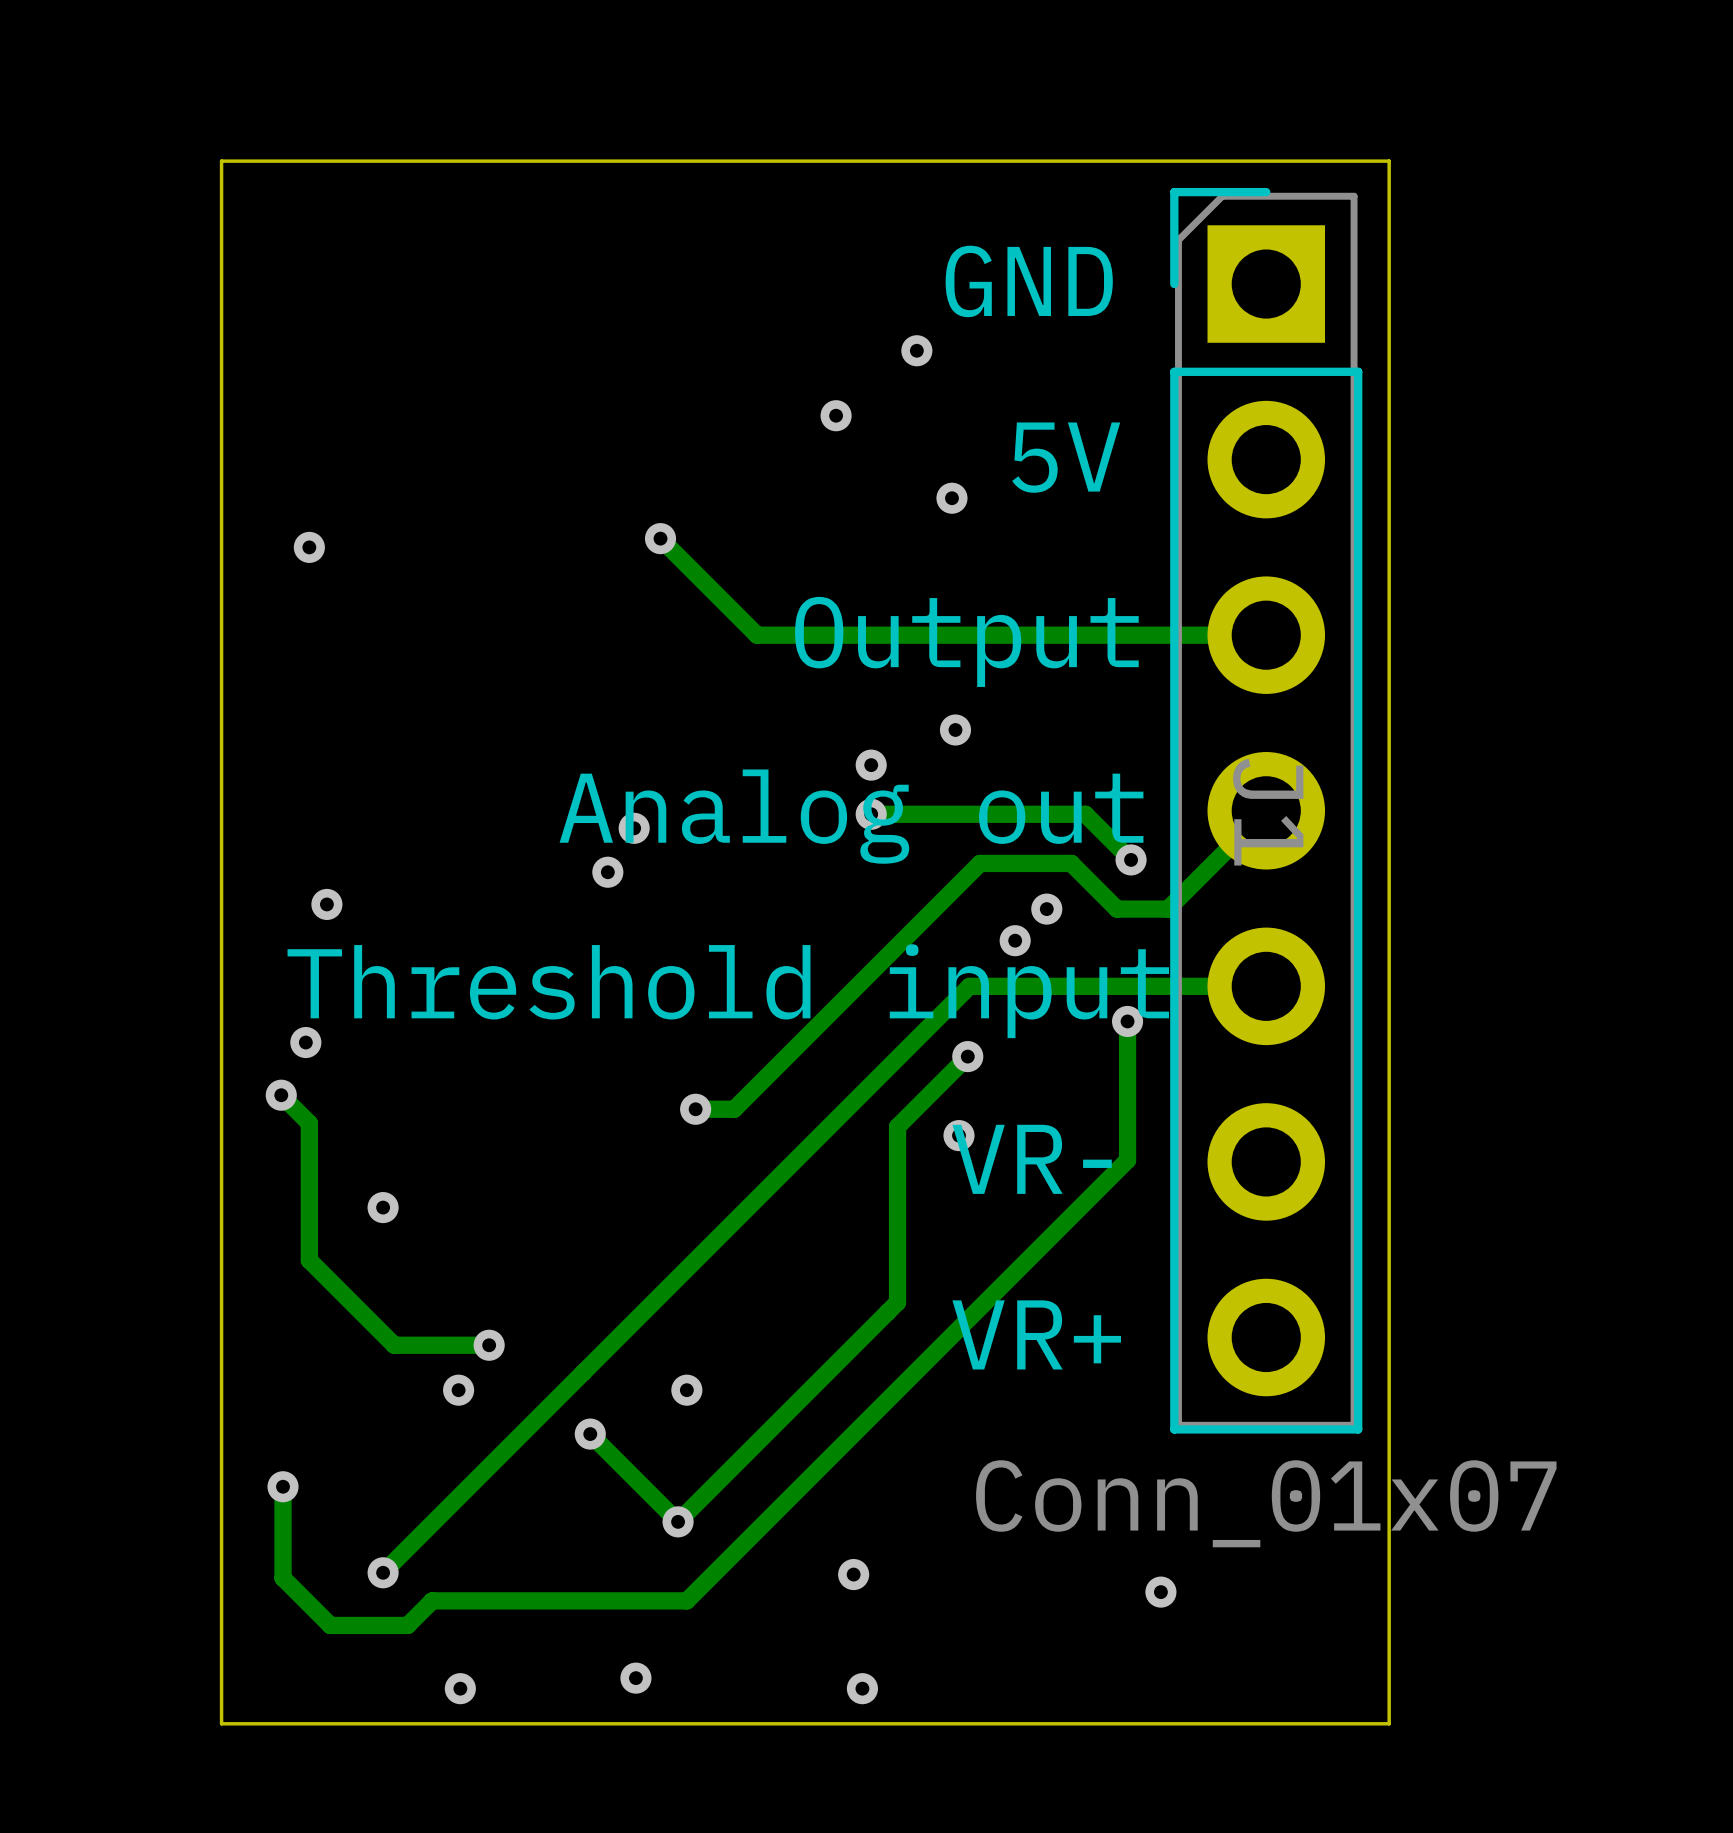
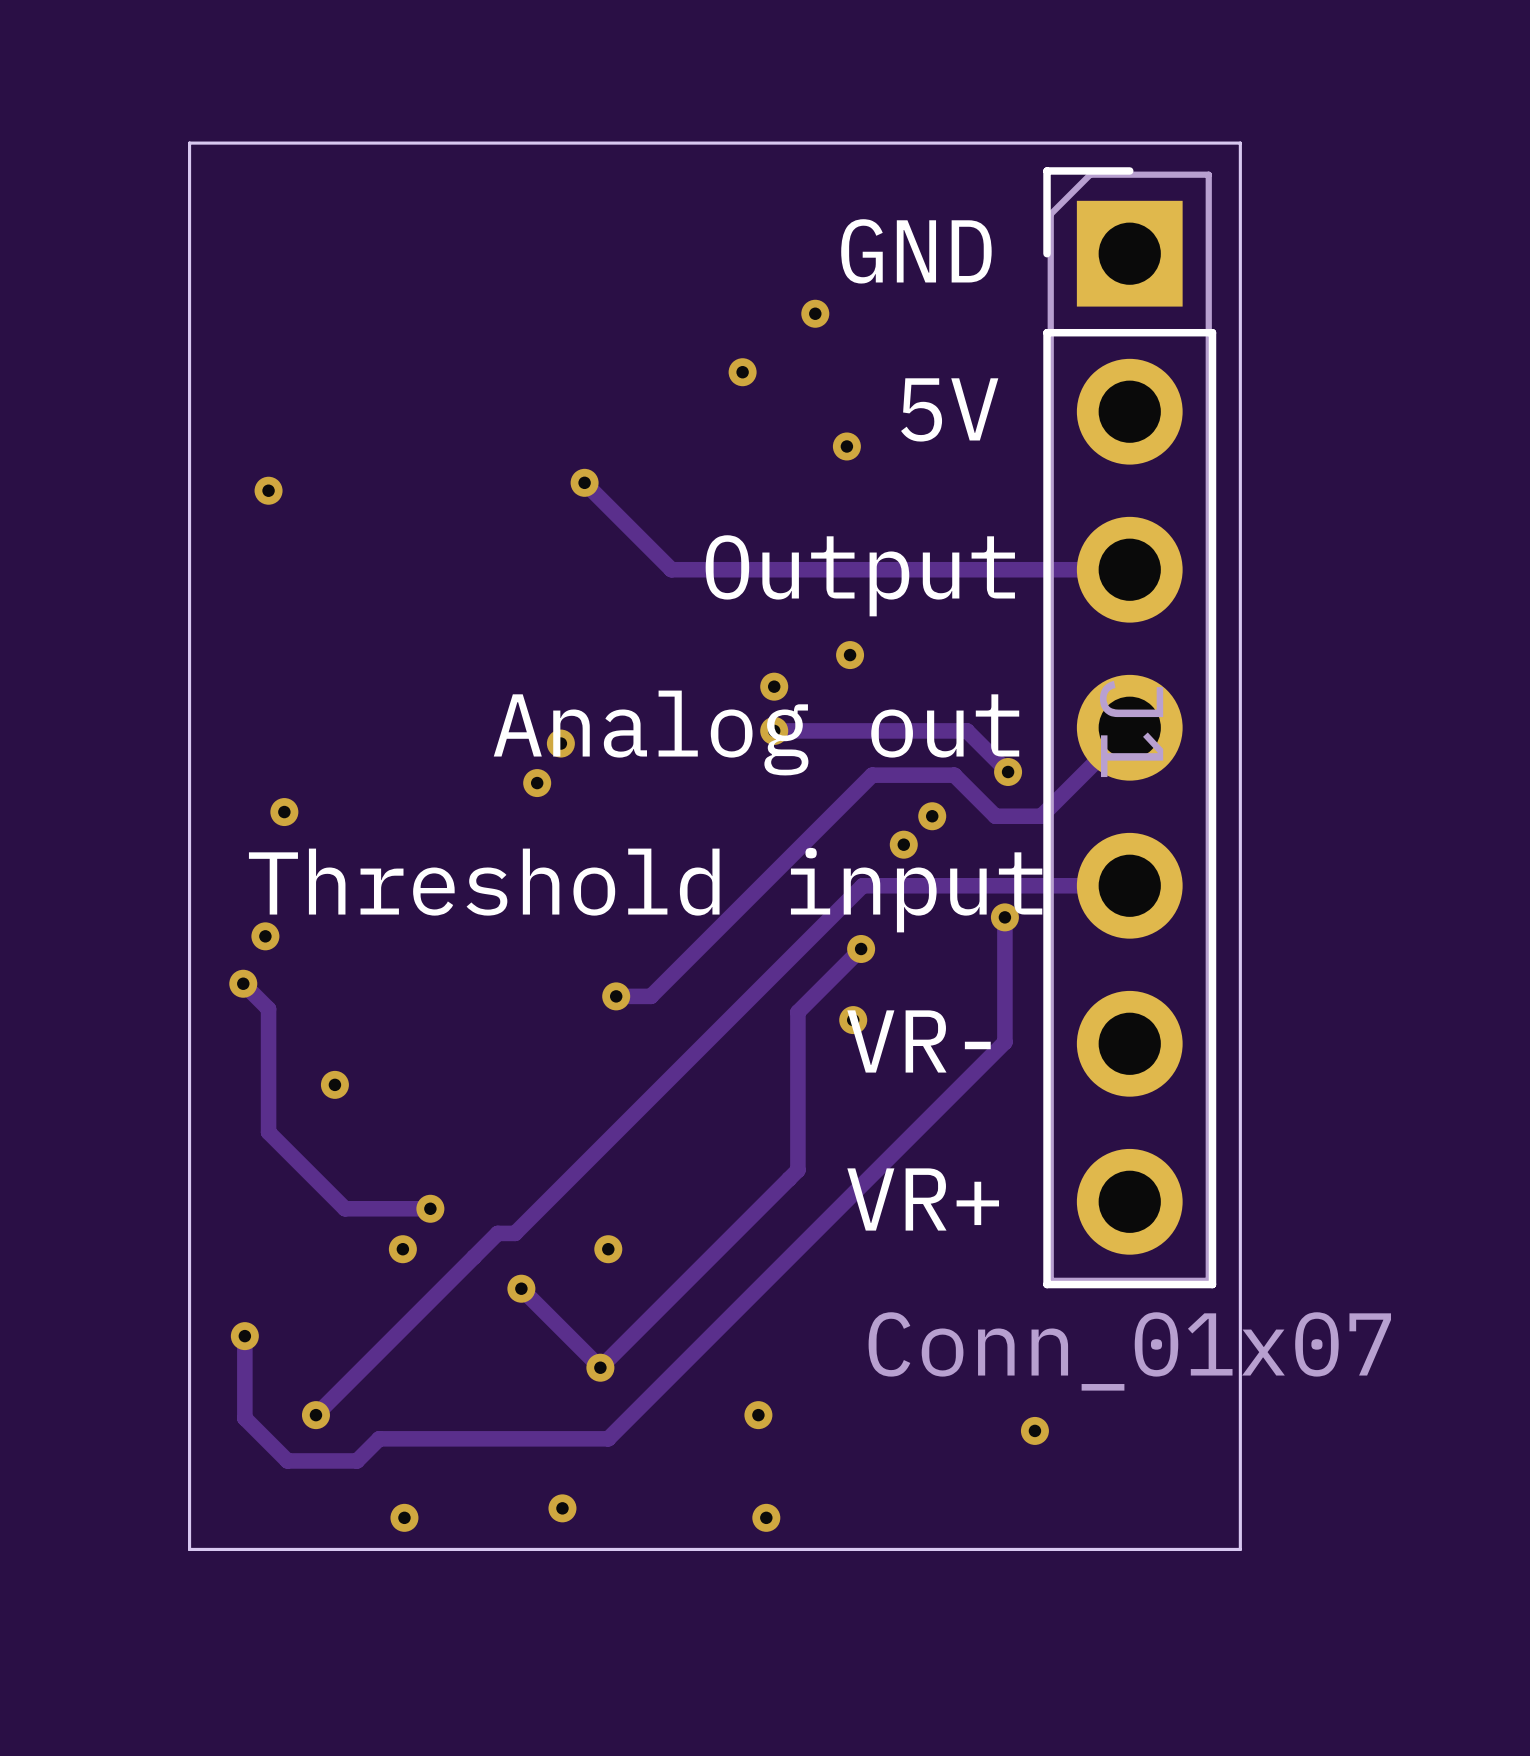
track: (583, 1372) (383, 1572) -> (515, 1233) (497, 1233) (315, 1415)
via position: (383, 1572) -> (315, 1415)

